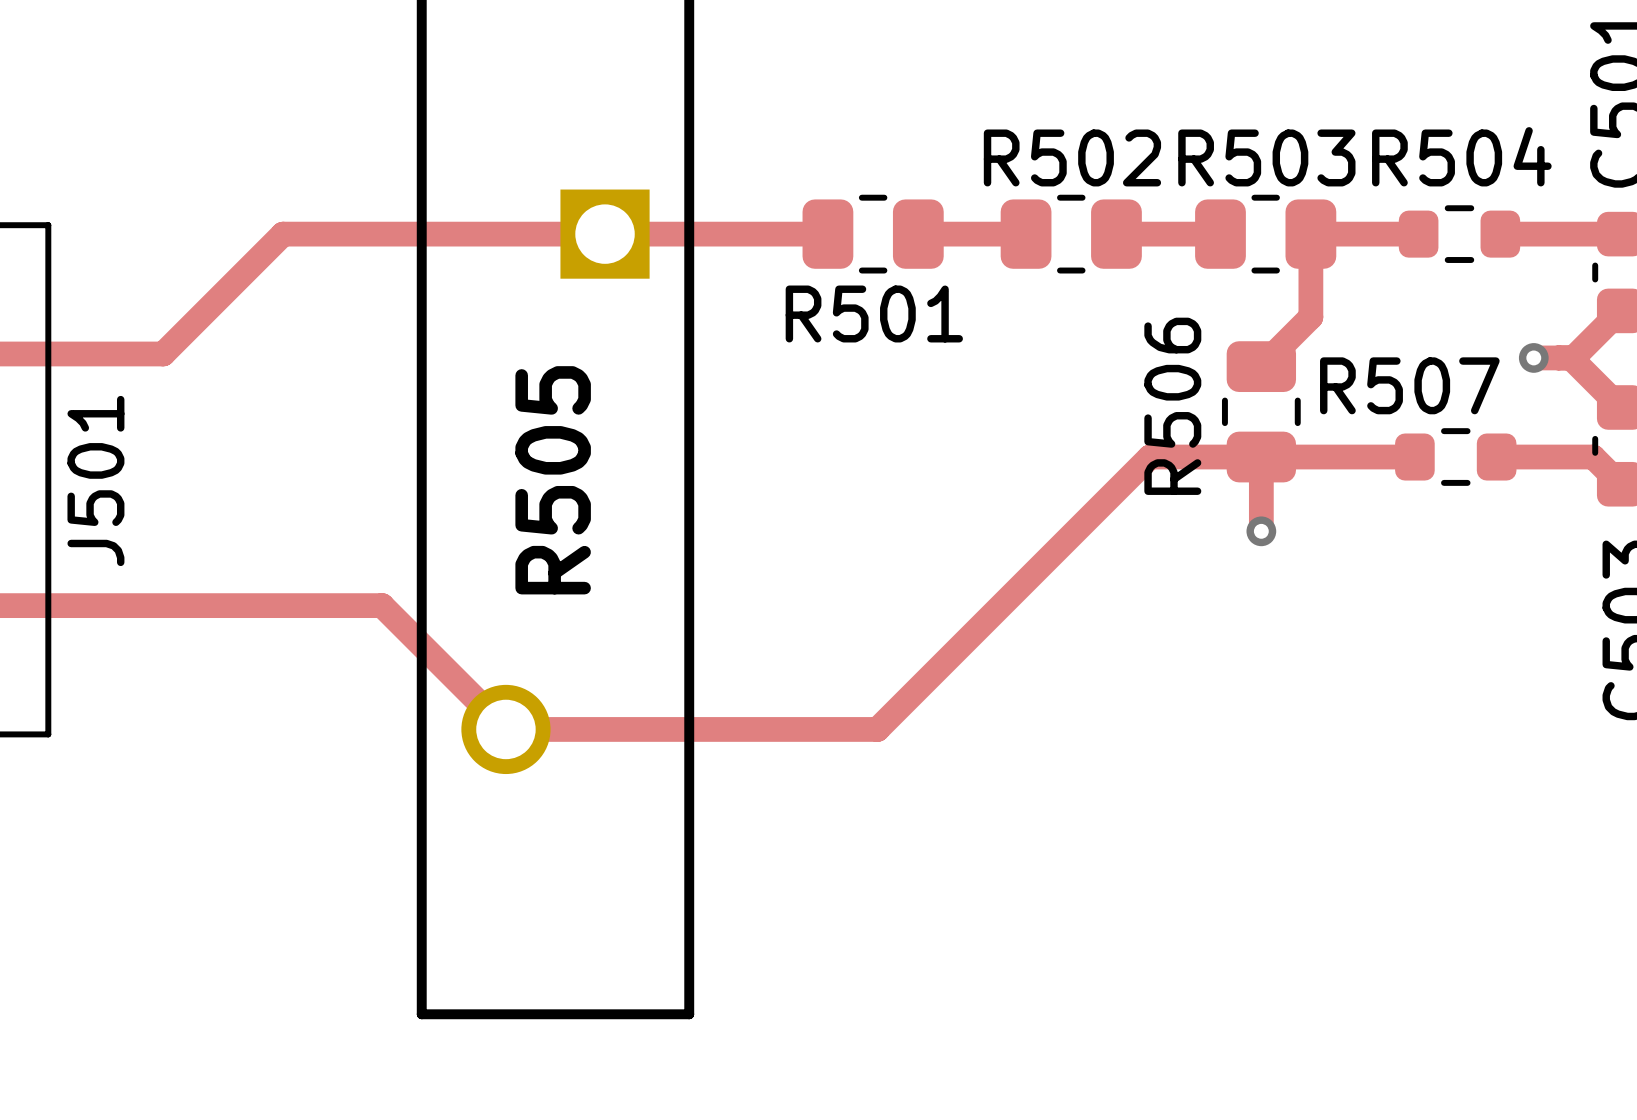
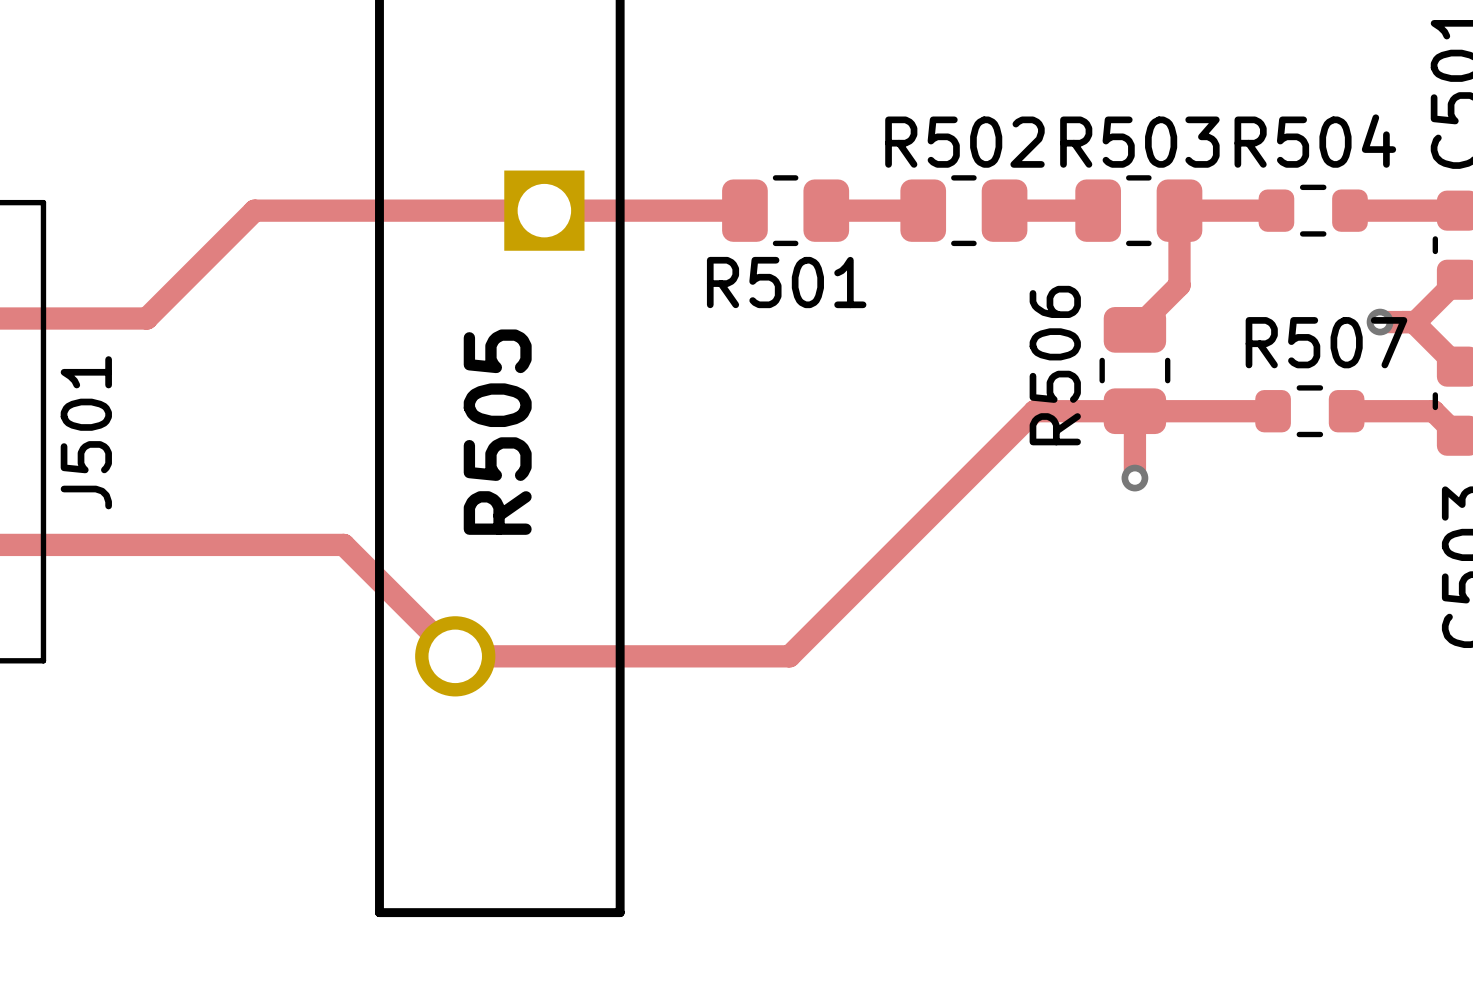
R507 name position: R507 (1409, 385) -> R507 (1326, 342)

